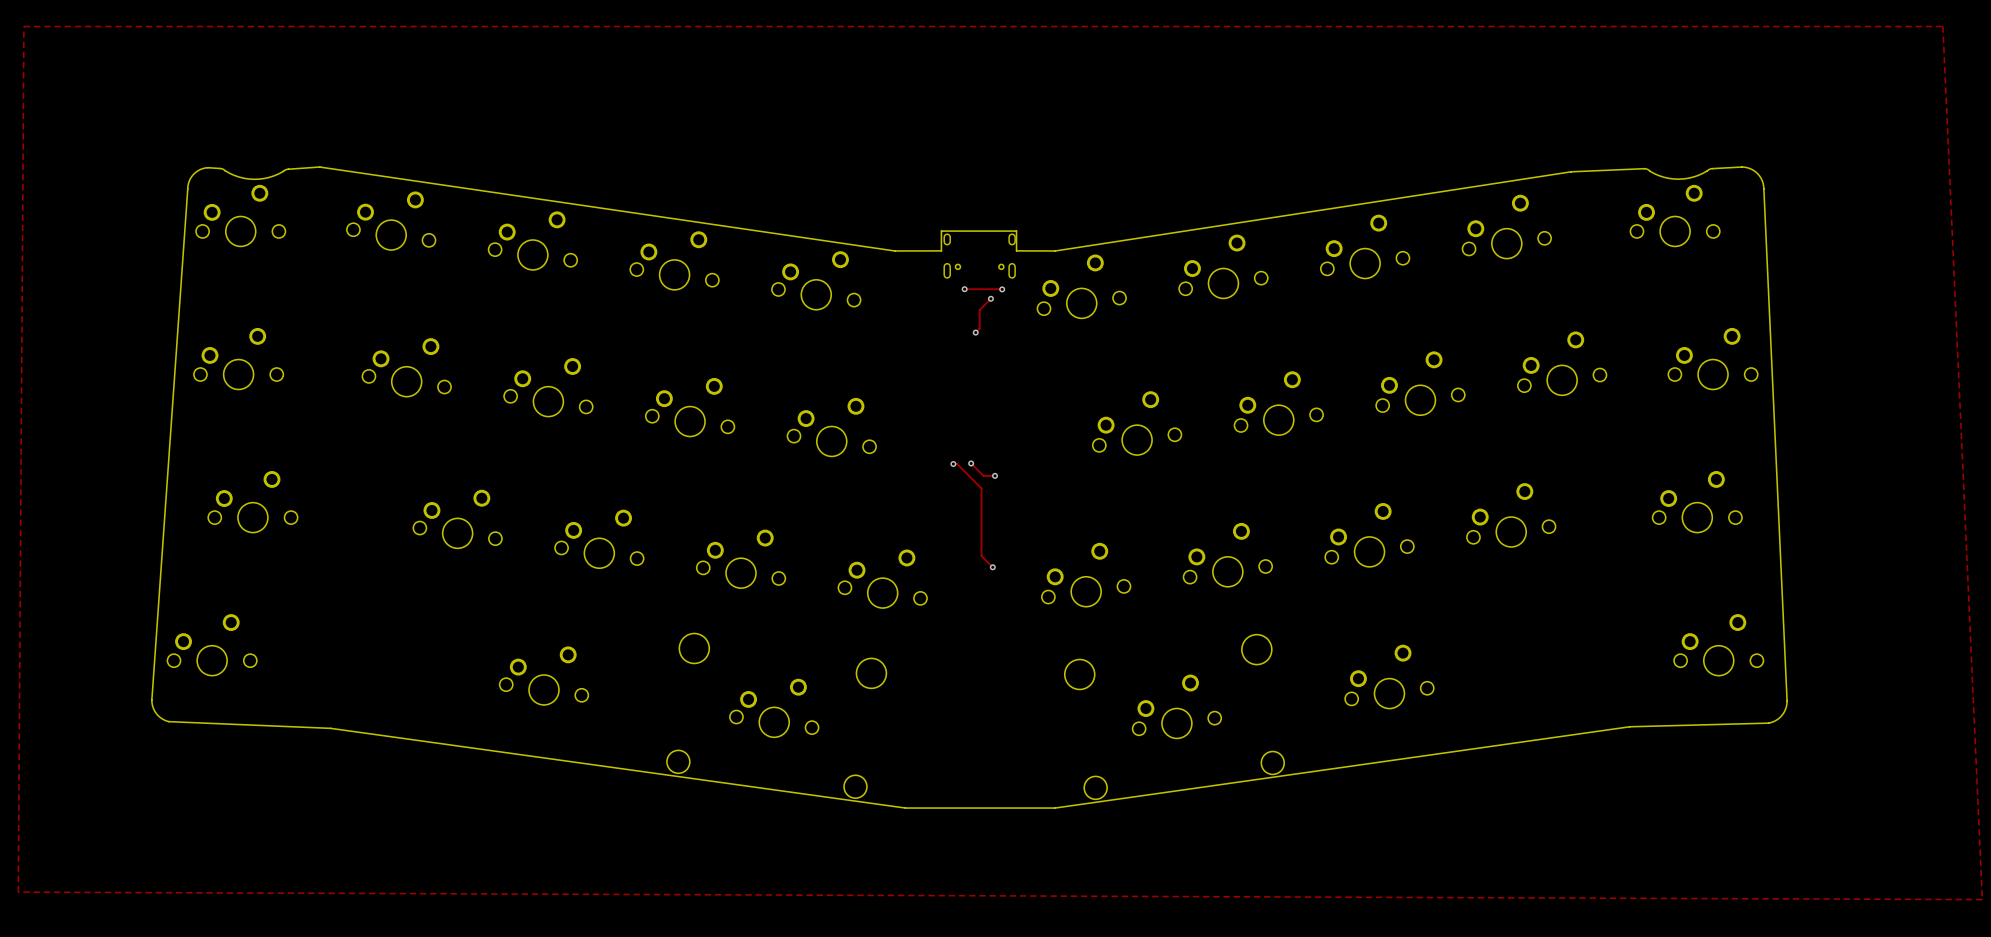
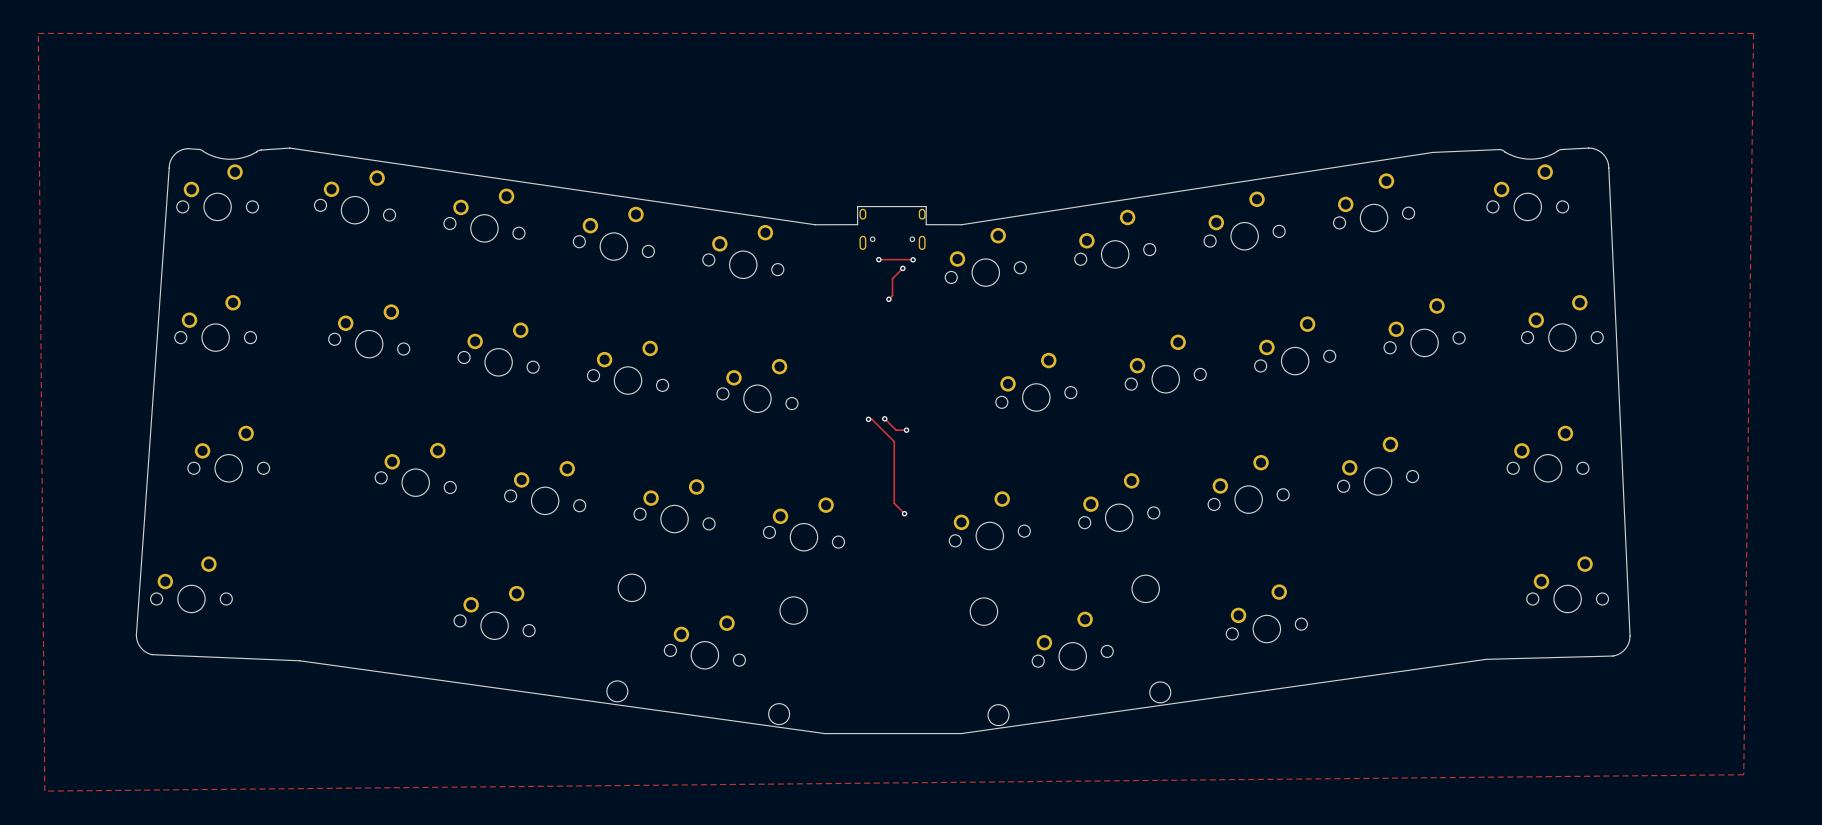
zone outline: (23, 26) (18, 892) (1982, 899) (1942, 26) (23, 26) -> (38, 33) (44, 791) (1743, 774) (1753, 33) (38, 33)

